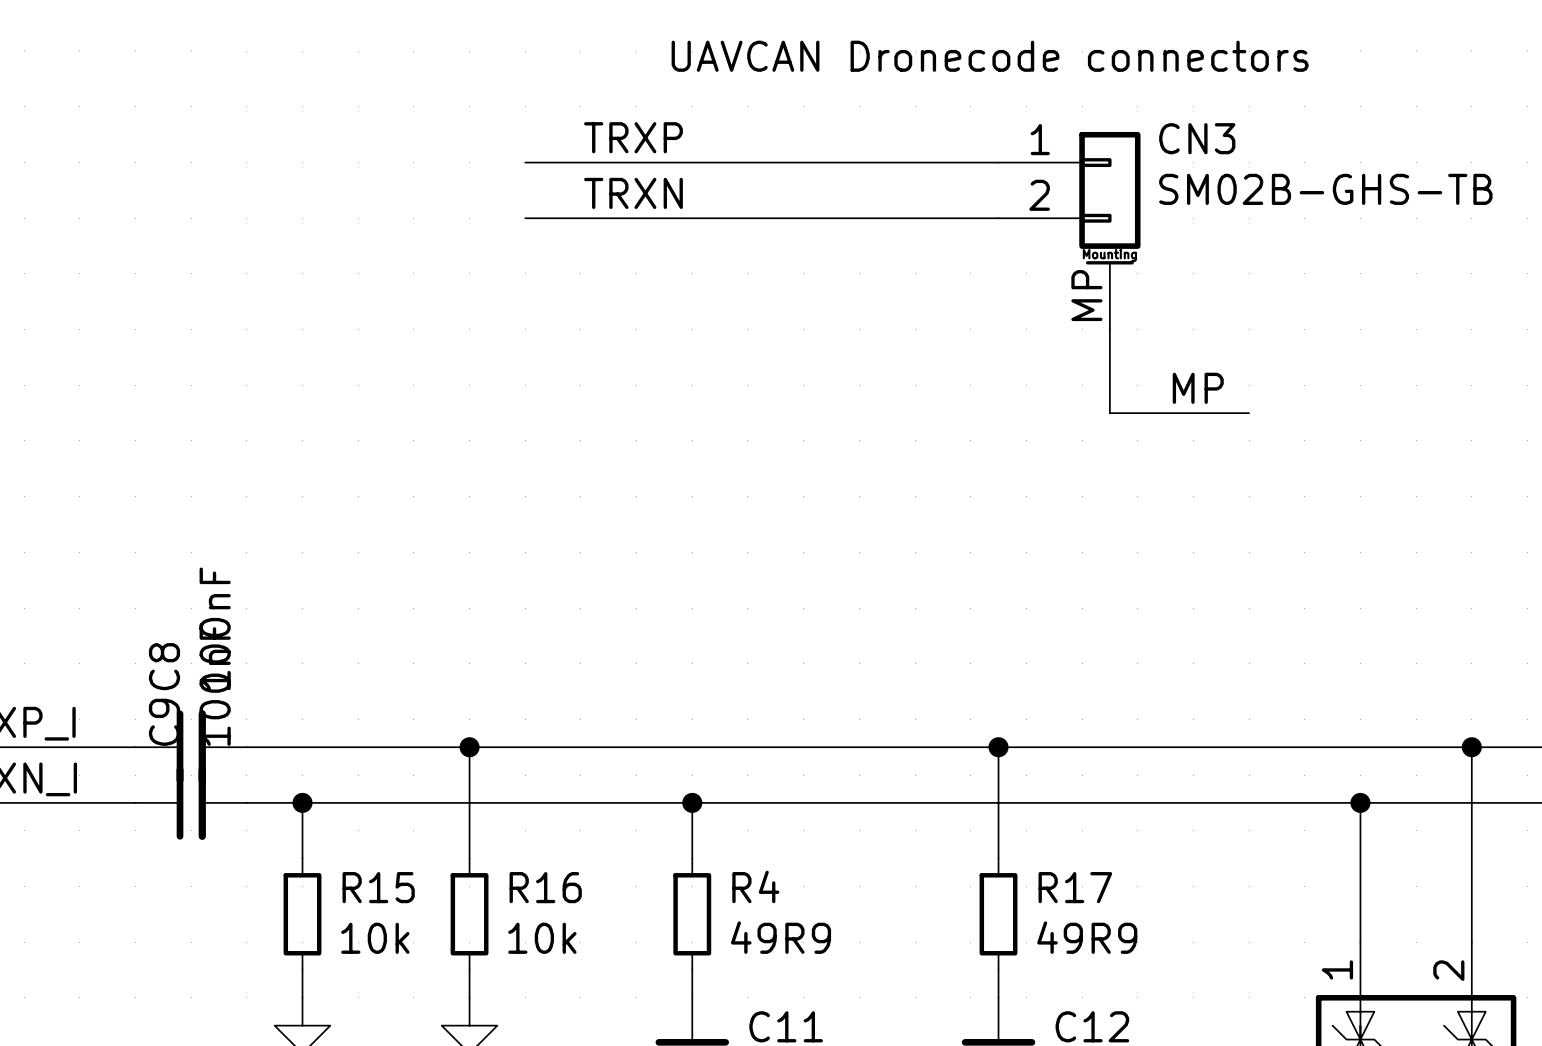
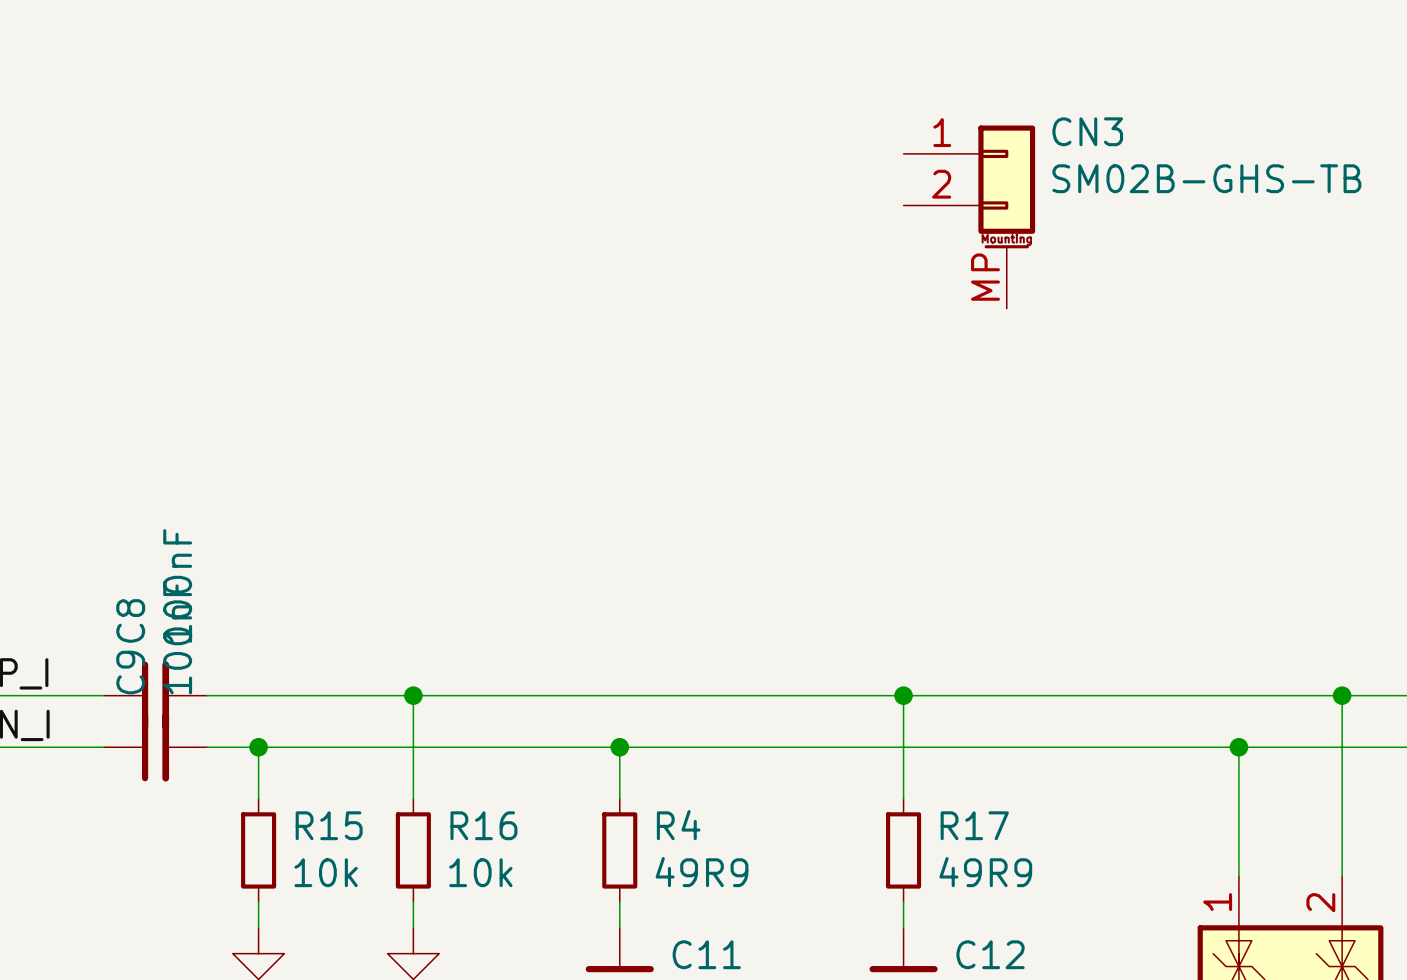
text: UAVCAN Dronecode connectors (990, 56) -> none
label: TRXP (633, 137) -> none
wire: (525, 162) (998, 162) -> none
label: TRXN (633, 193) -> none
wire: (525, 218) (998, 218) -> none
wire: (1109, 329) (1109, 413) (1249, 413) -> none
label: MP (1198, 388) -> none

